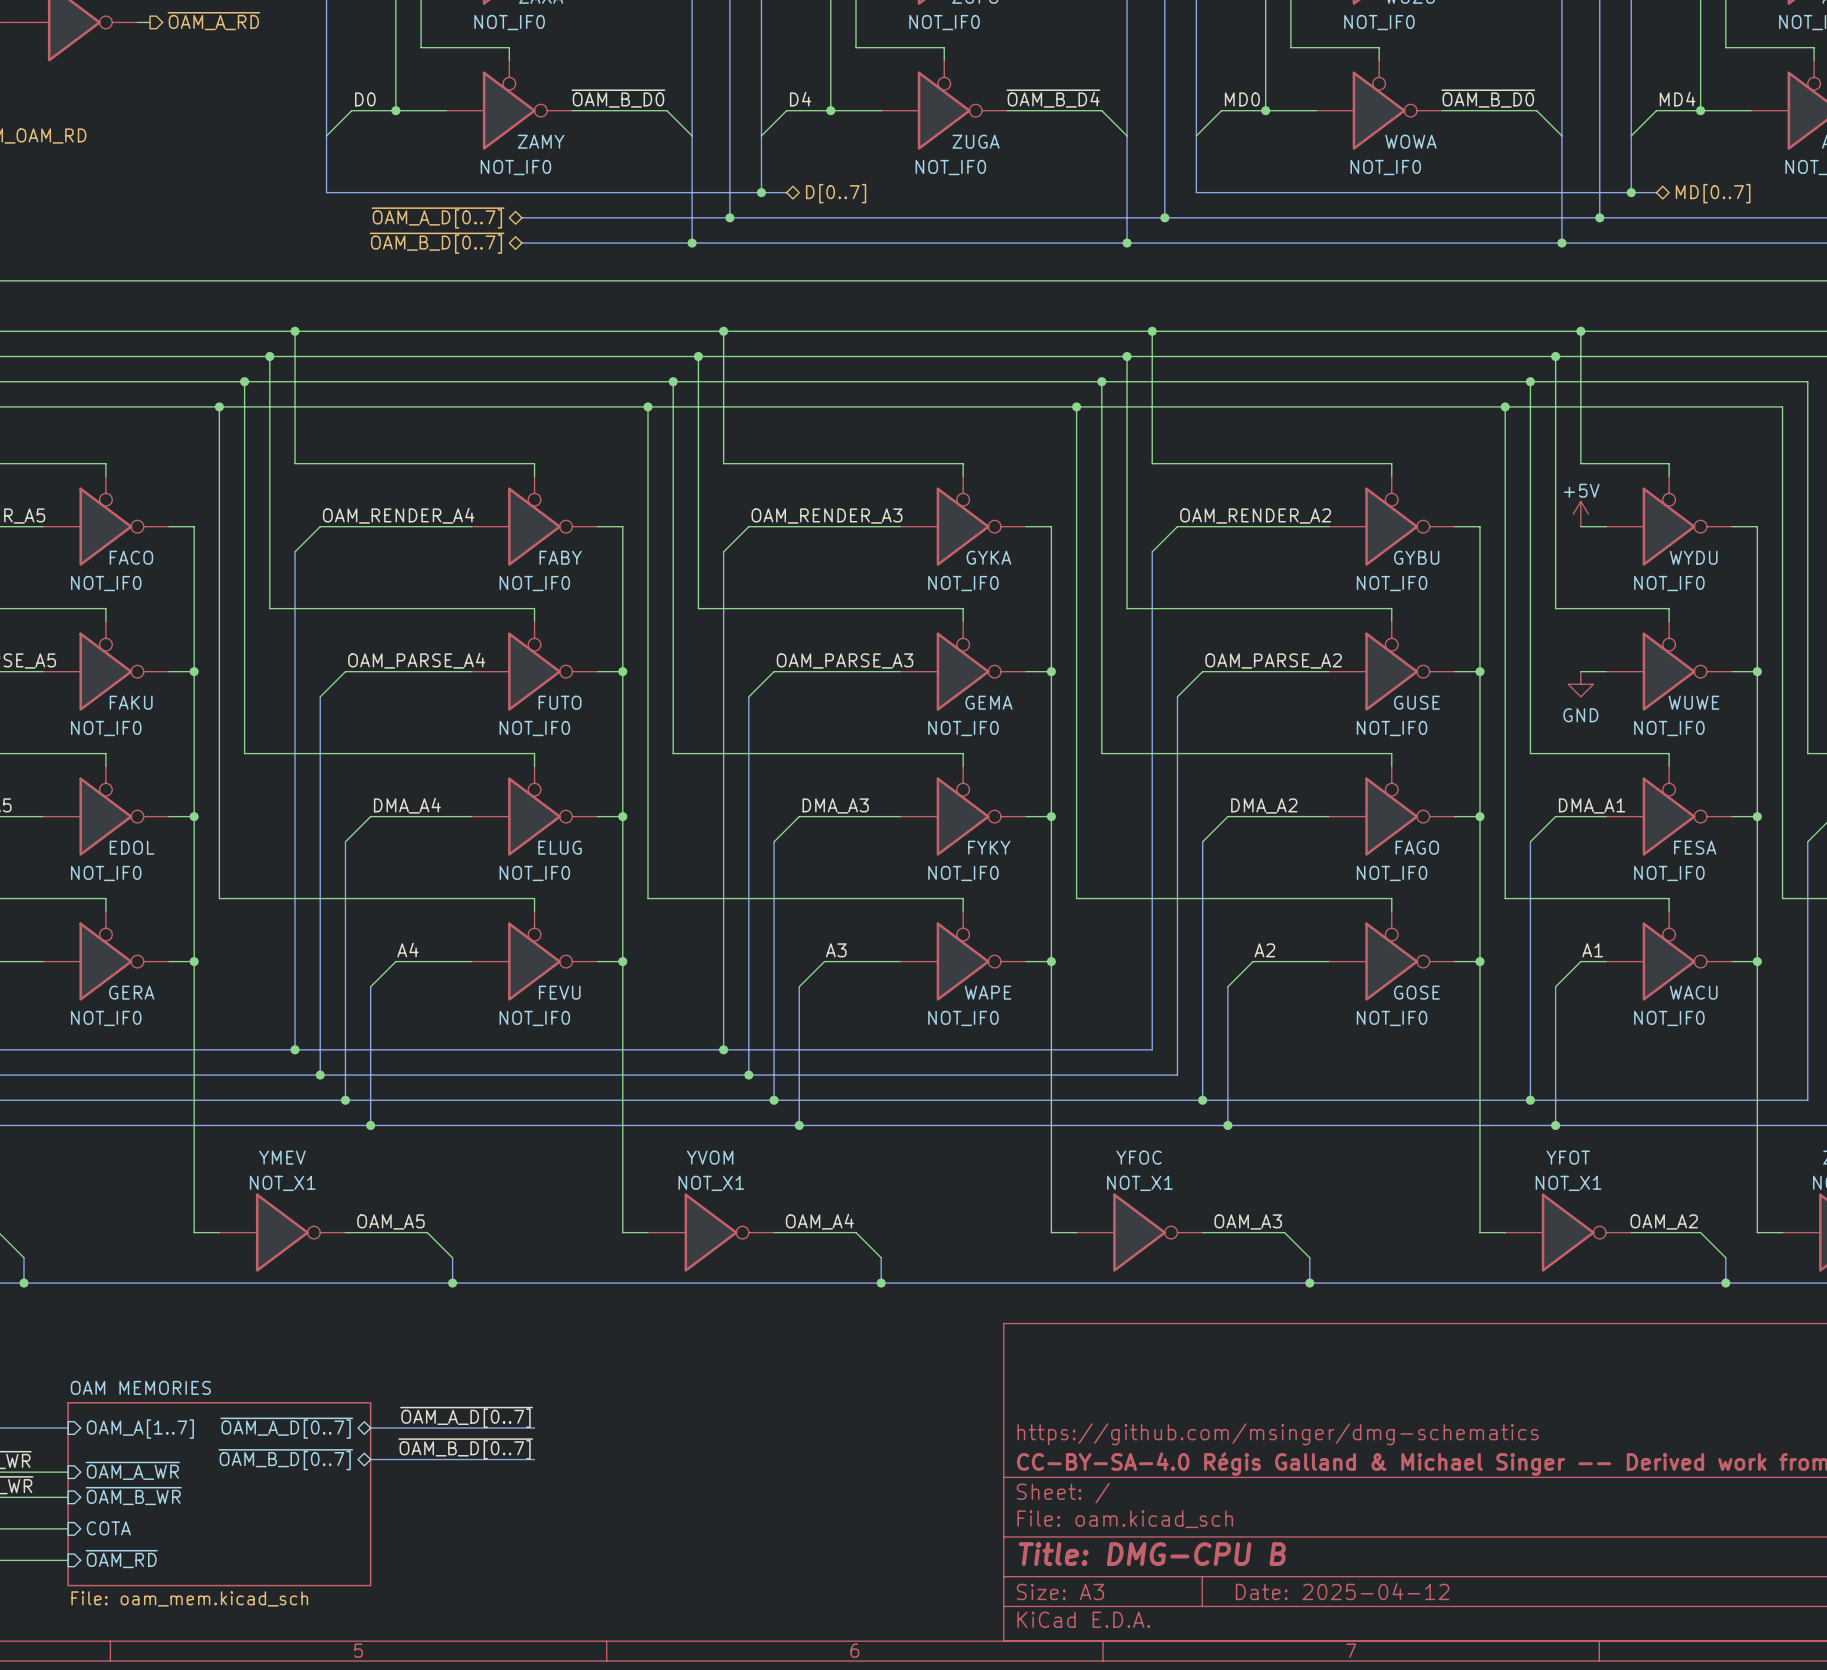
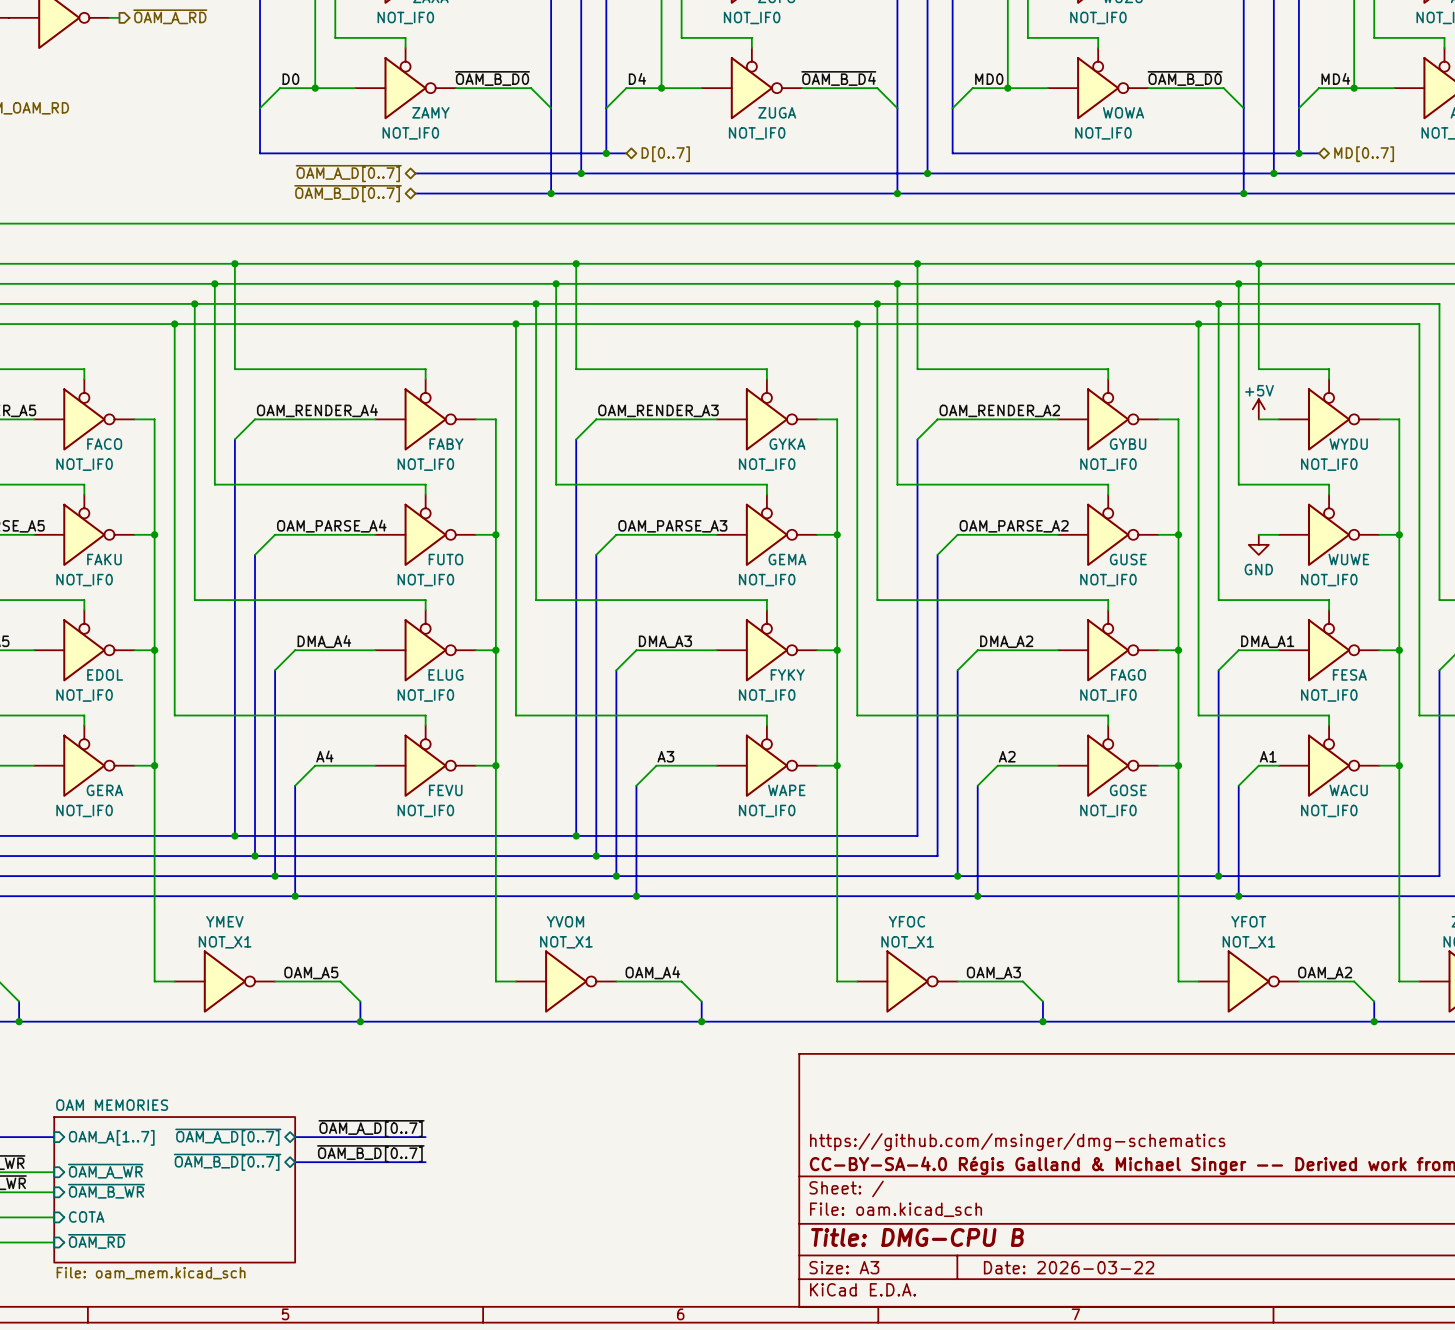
title block: Date: 2025-04-12 (1342, 1591) -> Date: 2026-03-22 (1069, 1267)

